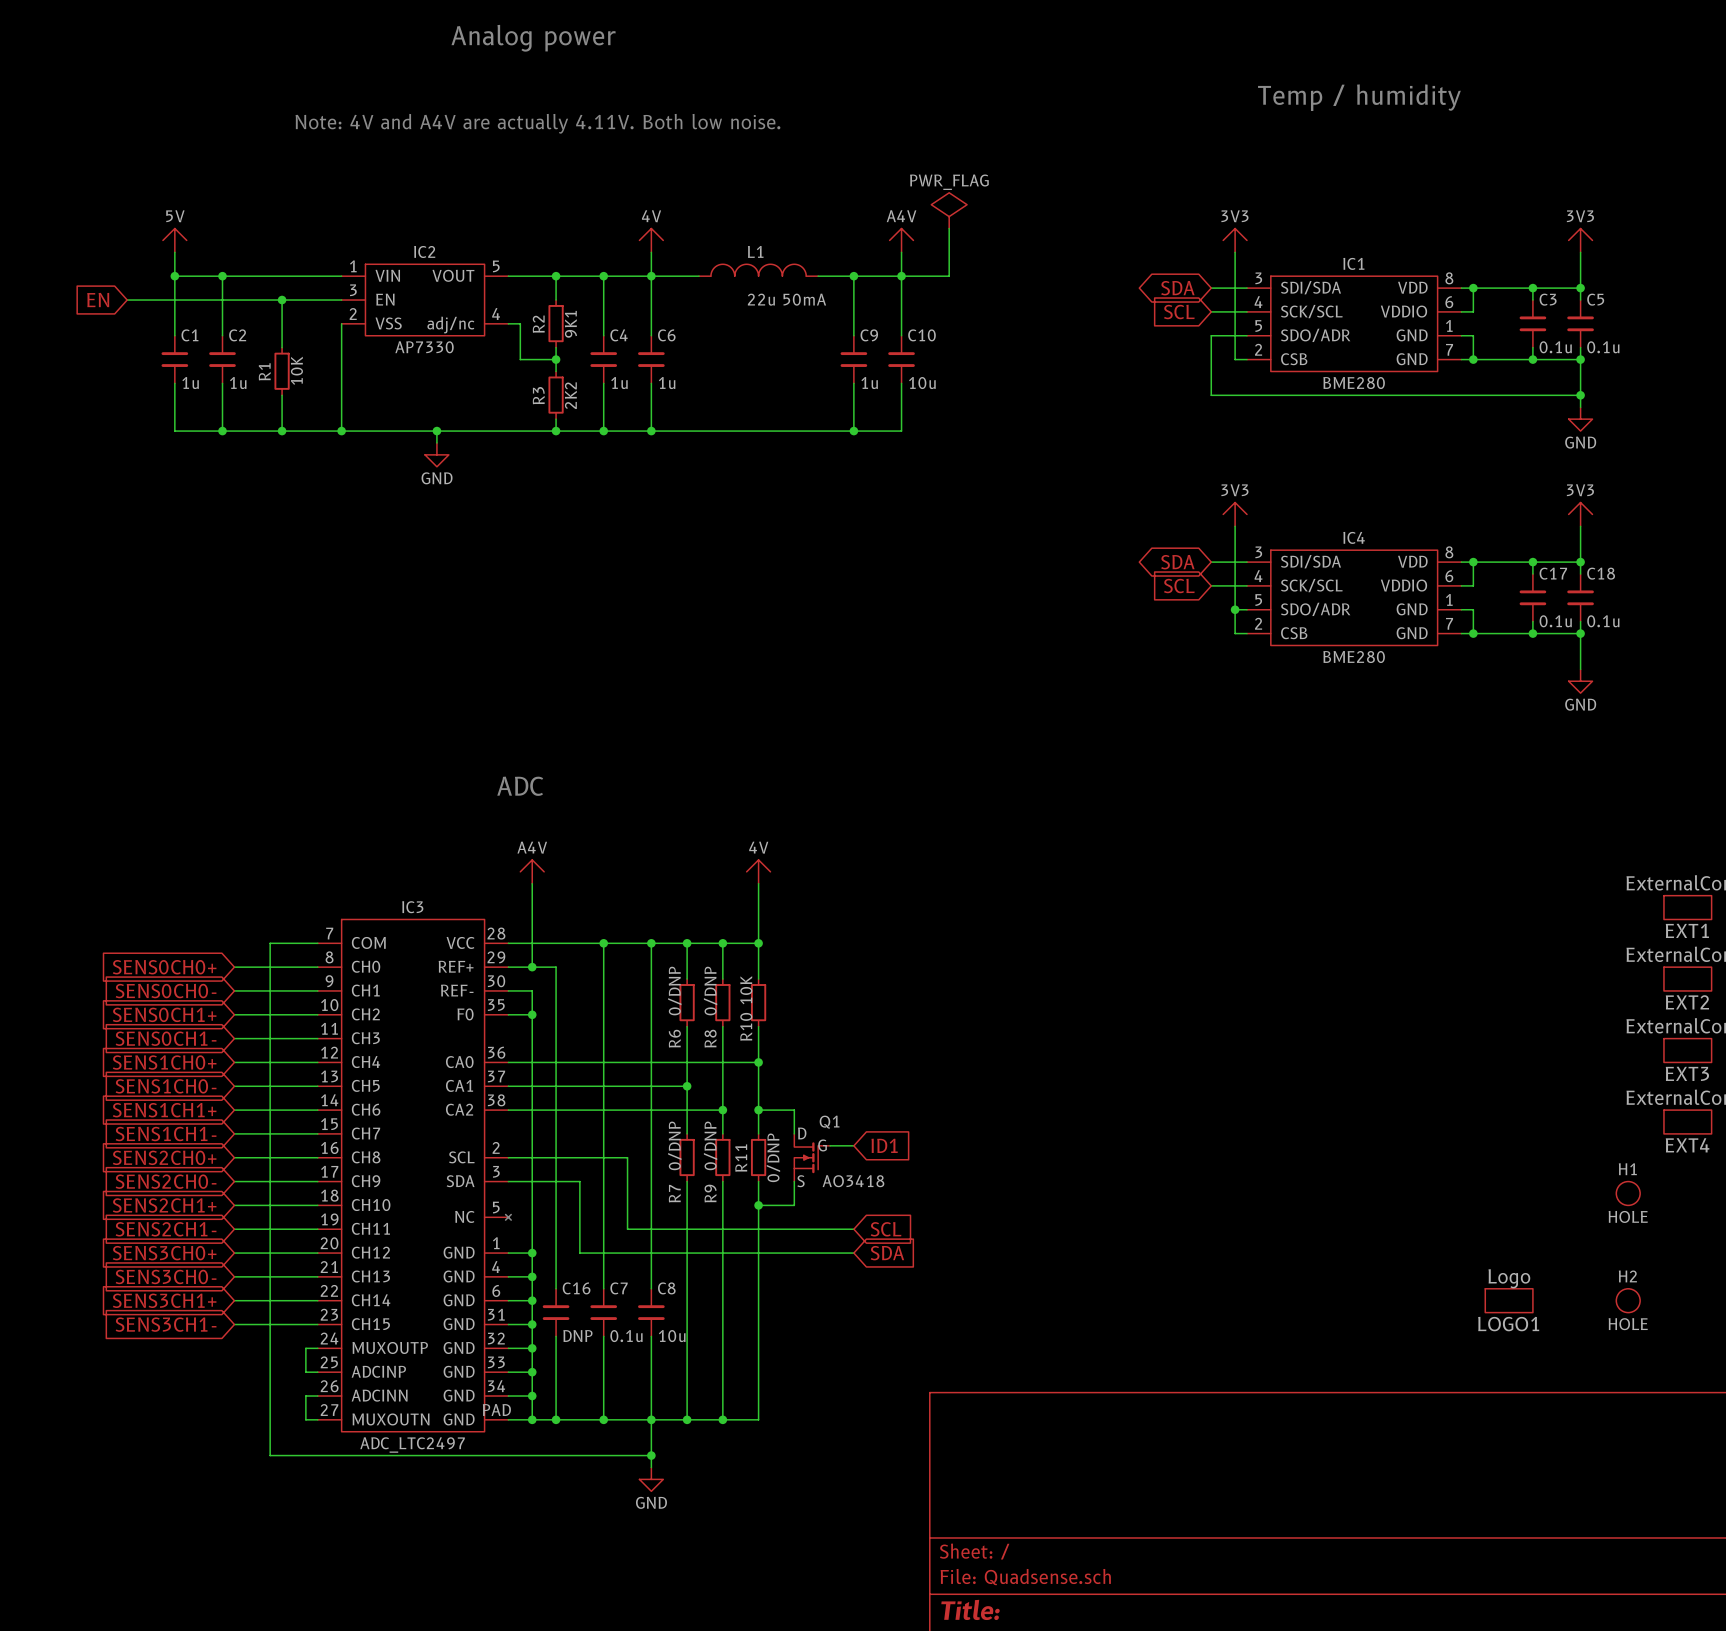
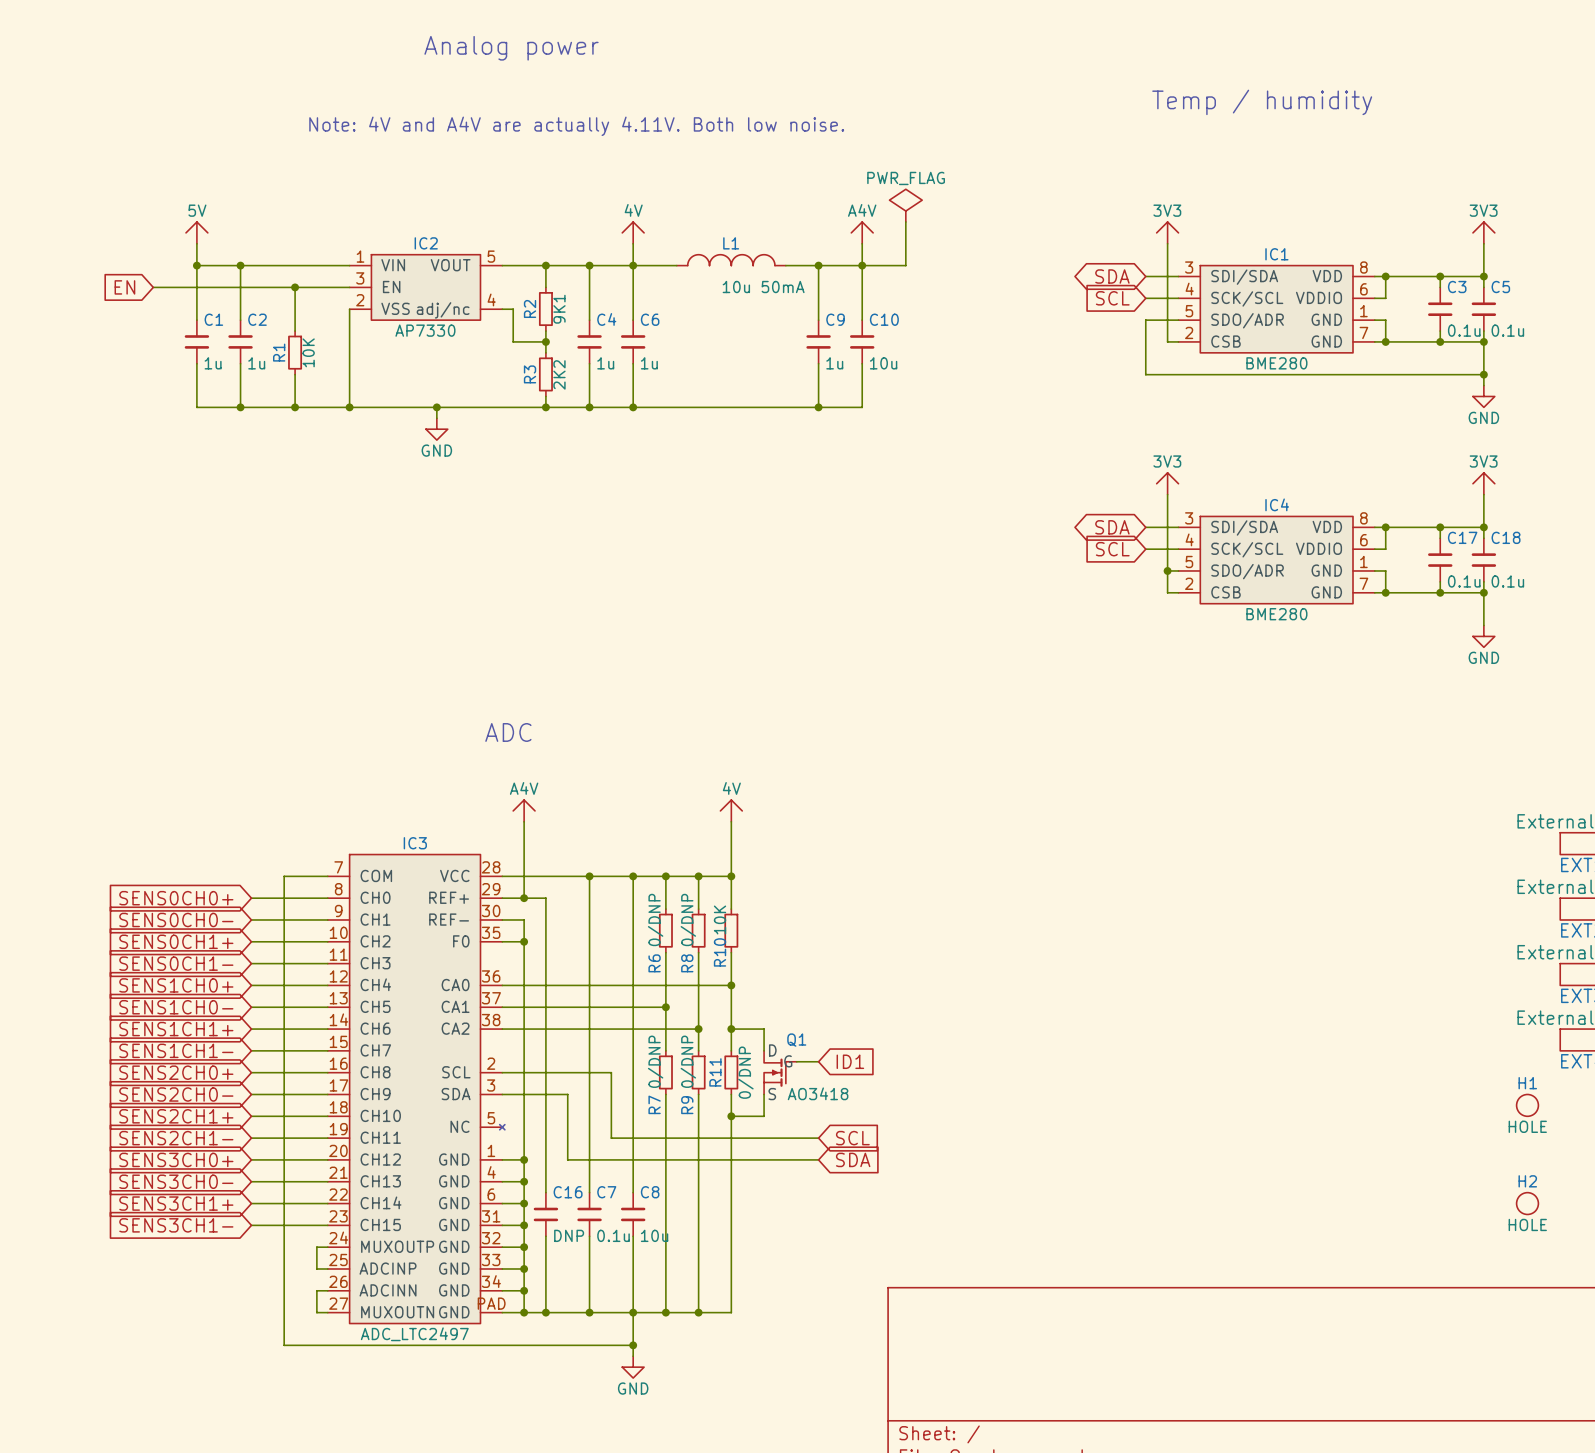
L1 value: 22u 50mA (786, 299) -> 10u 50mA (763, 287)
LOGO1: Logo (1509, 1300) -> none

